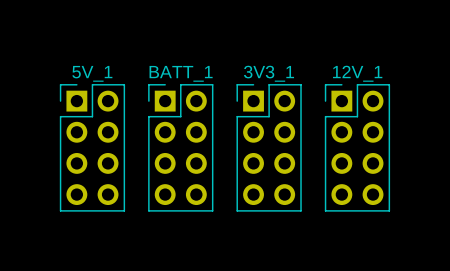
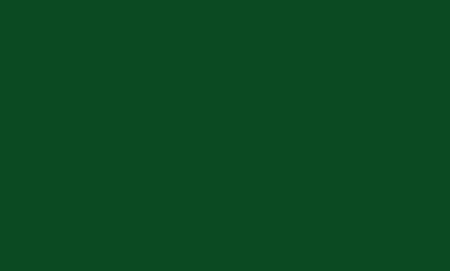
5V_1: (92, 147) -> none
BATT_1: (180, 147) -> none
3V3_1: (269, 147) -> none
12V_1: (357, 147) -> none

